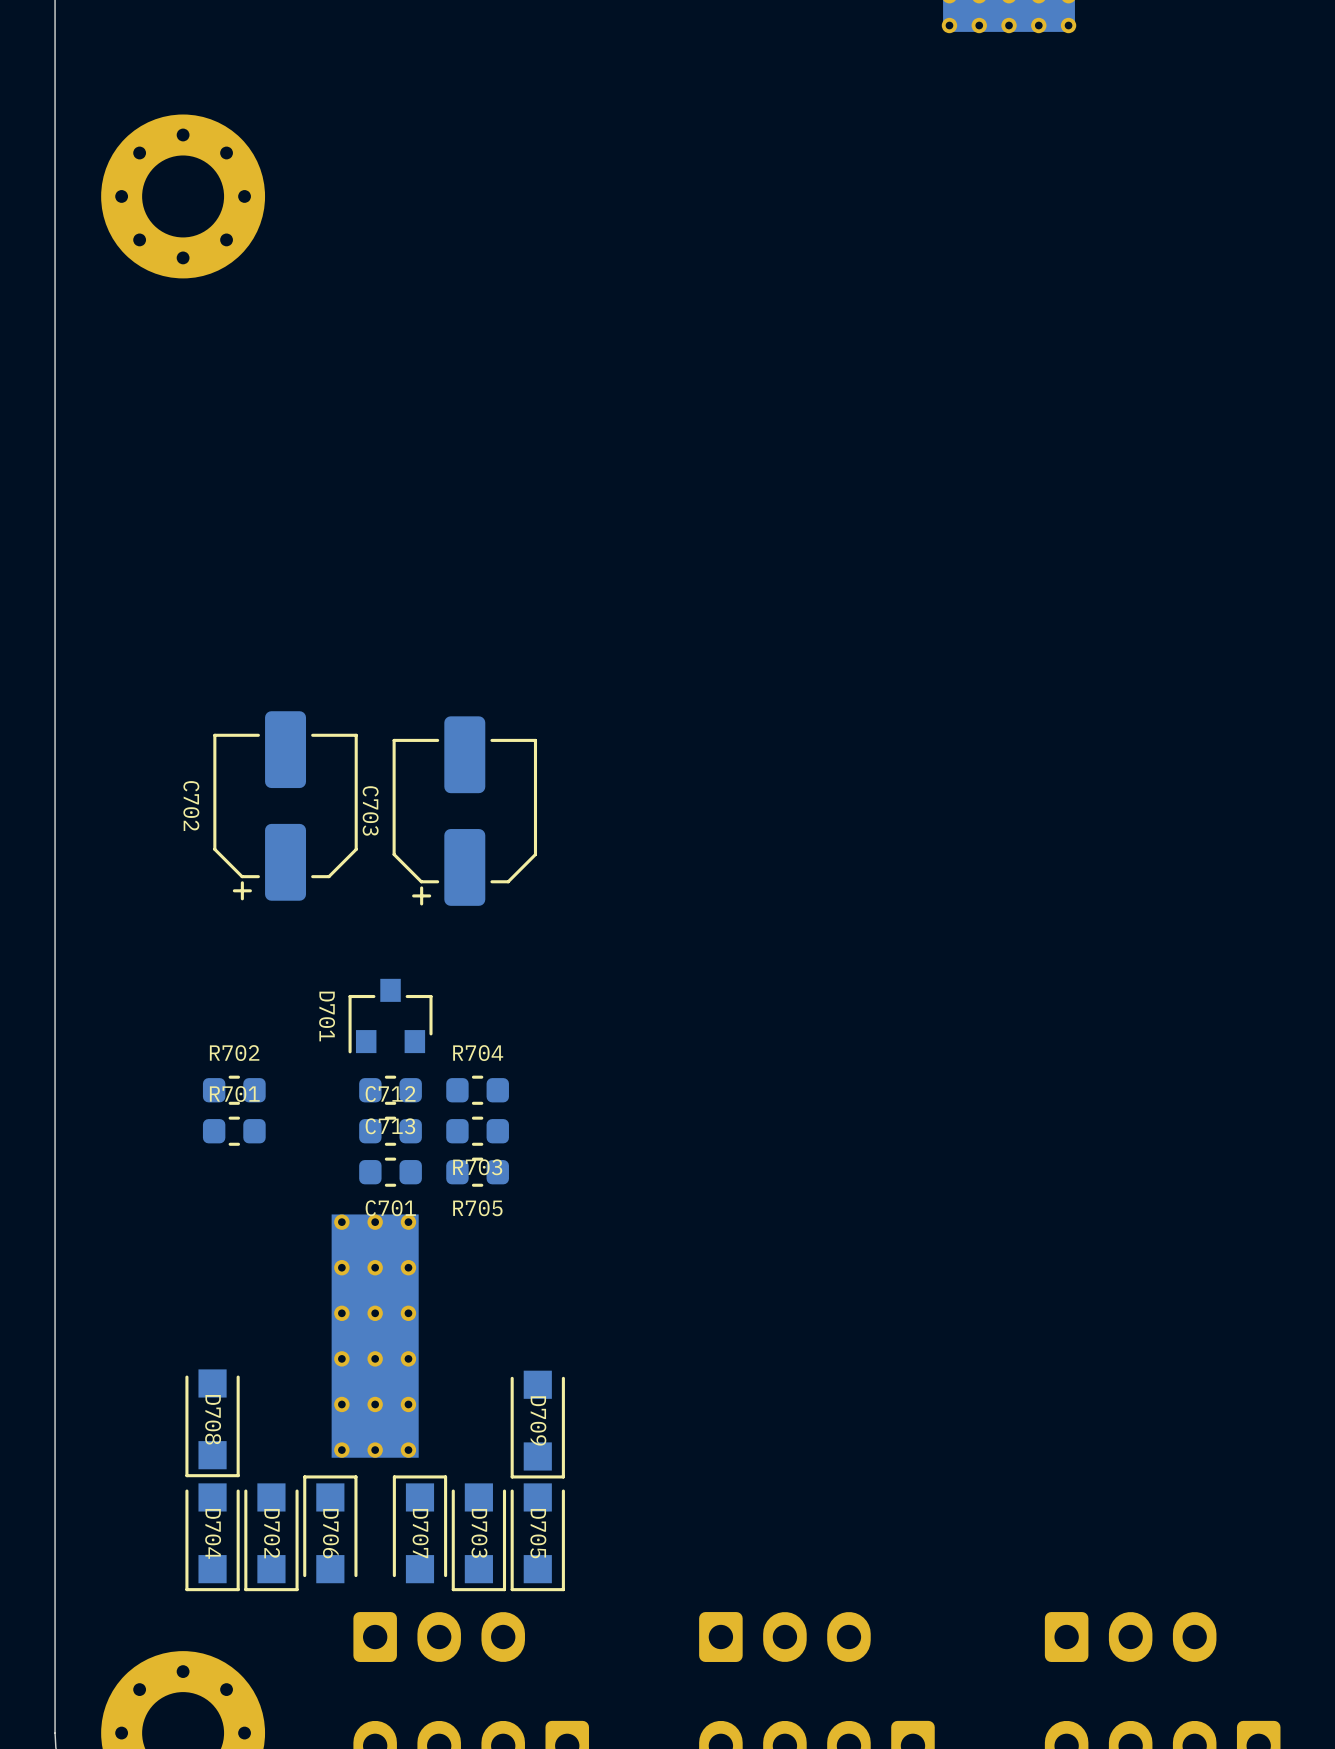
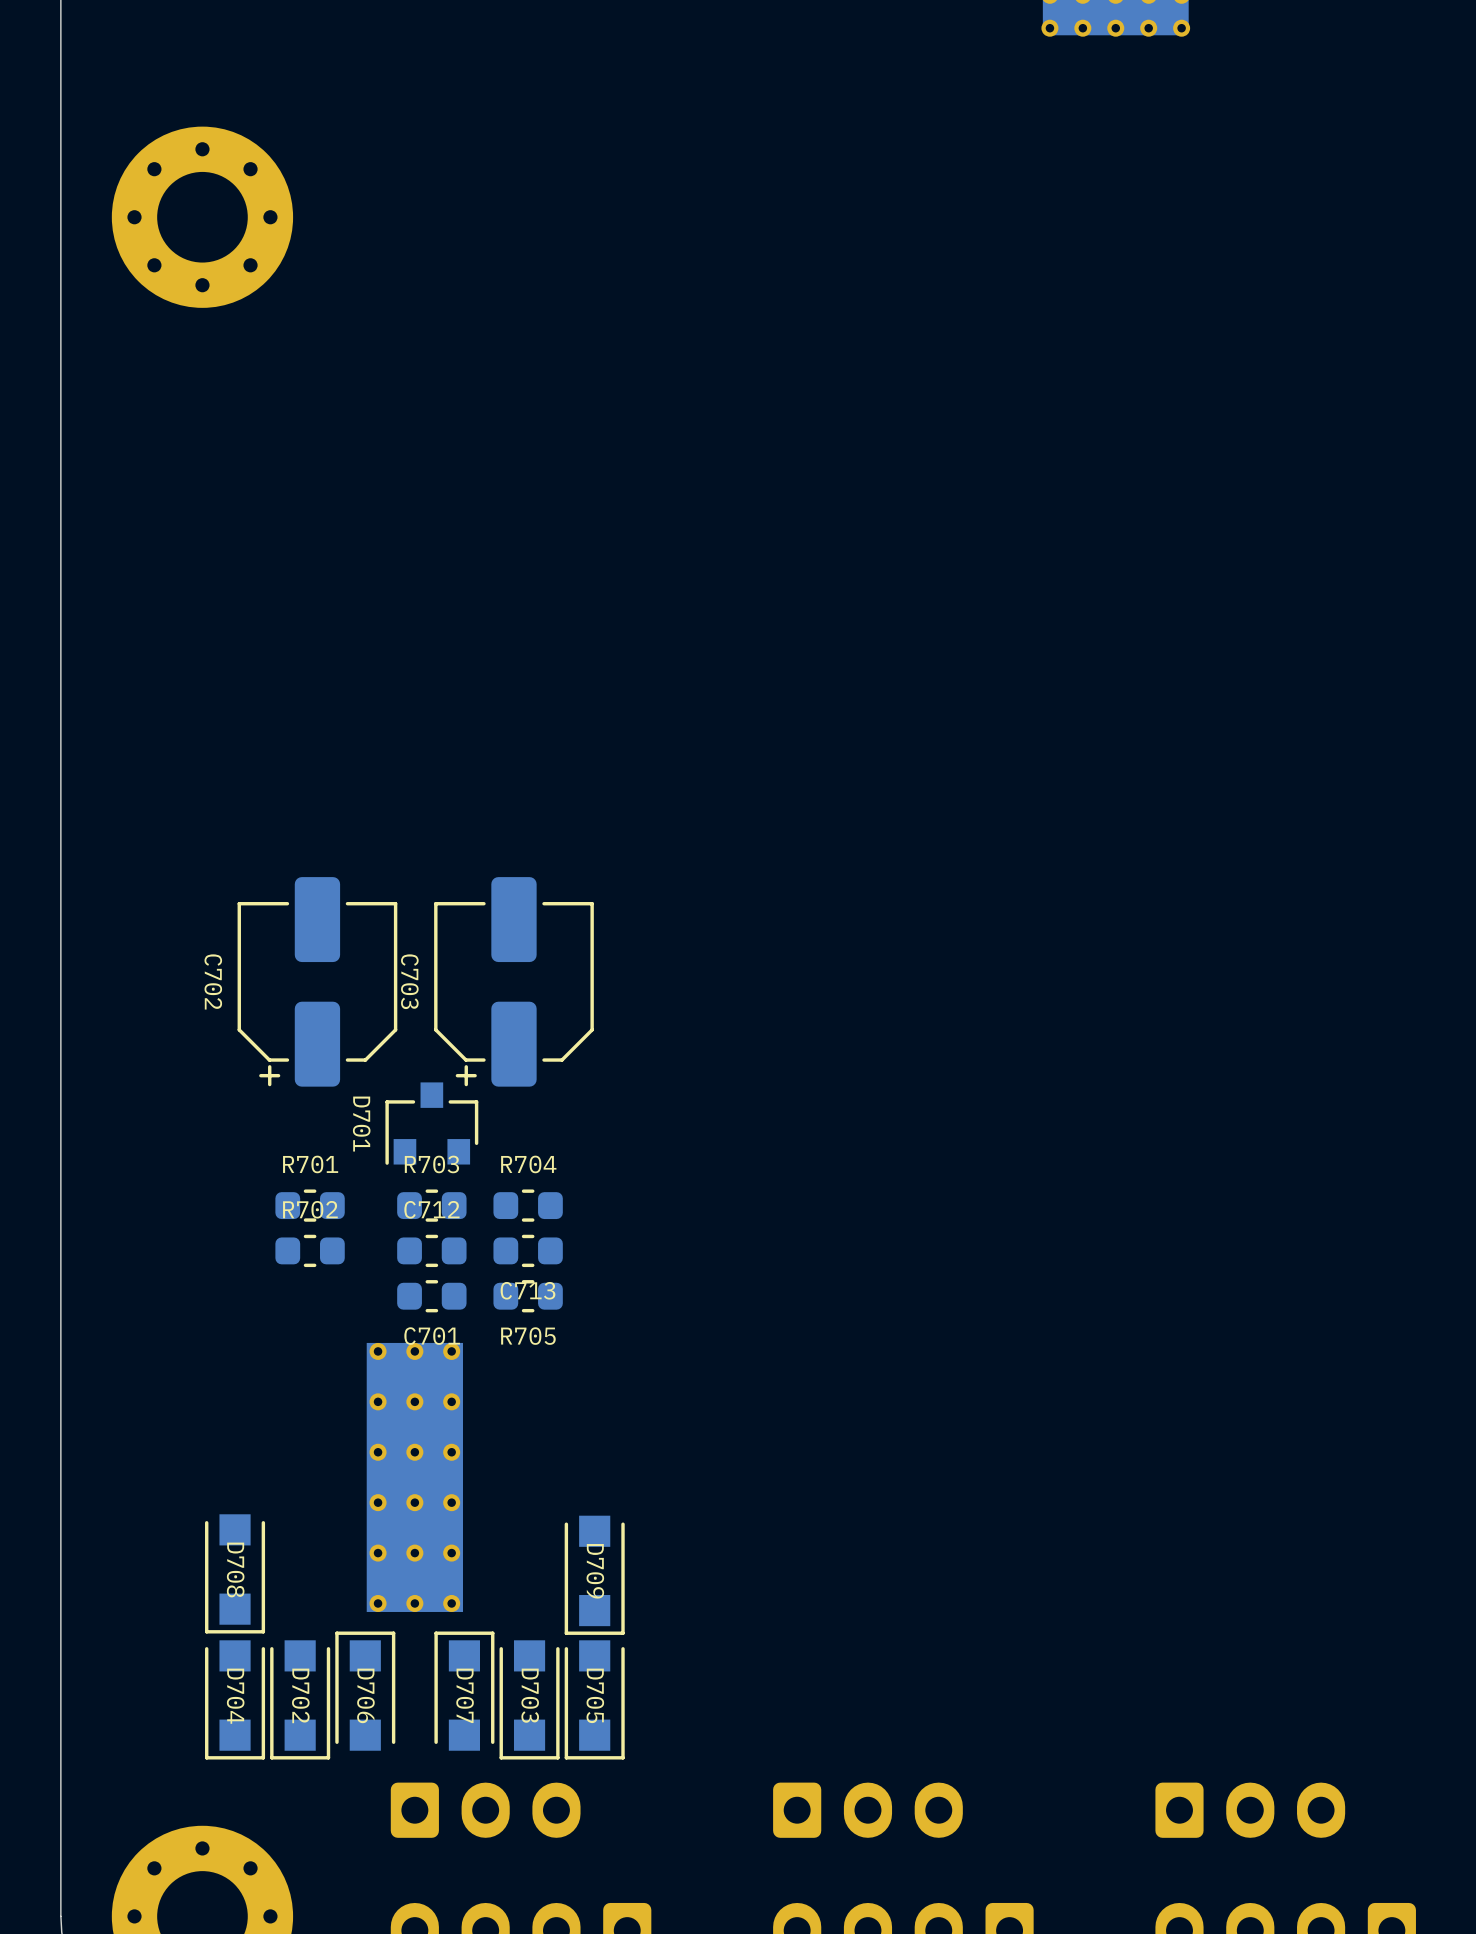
C702 position: (285, 805) -> (317, 981)
C703 position: (464, 811) -> (513, 981)
R702 position: (234, 1090) -> (310, 1250)
C713 name: C713 (390, 1126) -> R703 (431, 1164)
R701 position: (234, 1131) -> (310, 1205)
R703 name: R703 (477, 1167) -> C713 (527, 1290)

